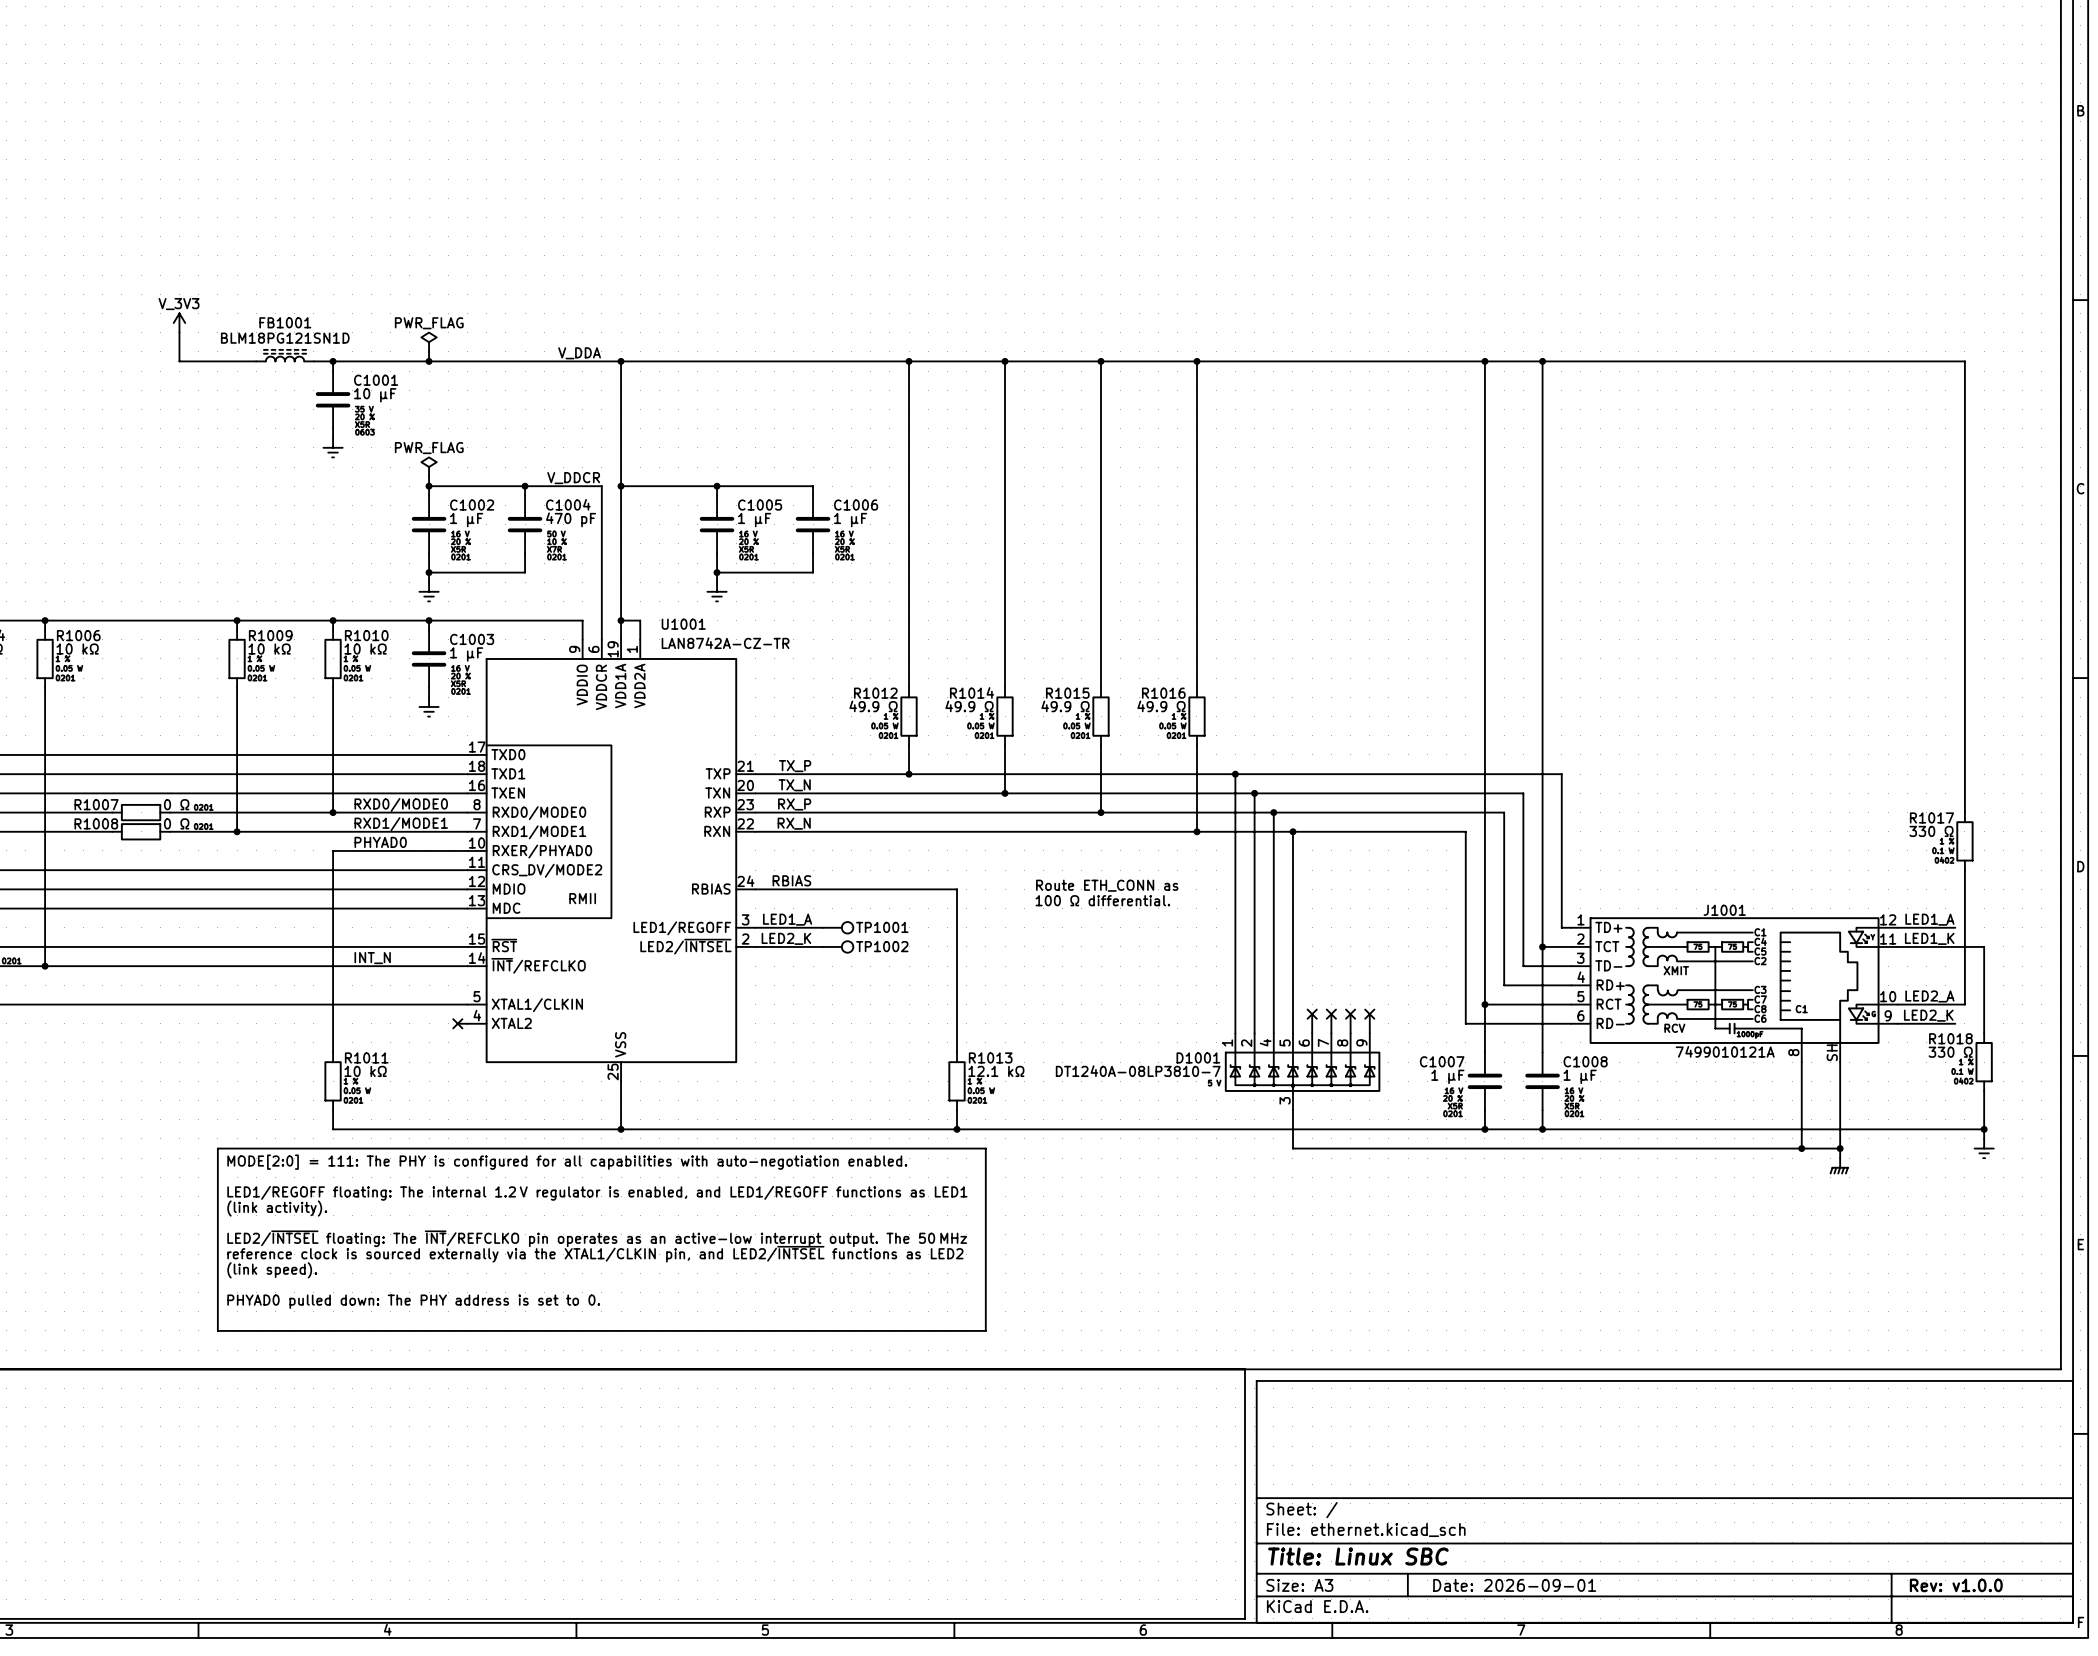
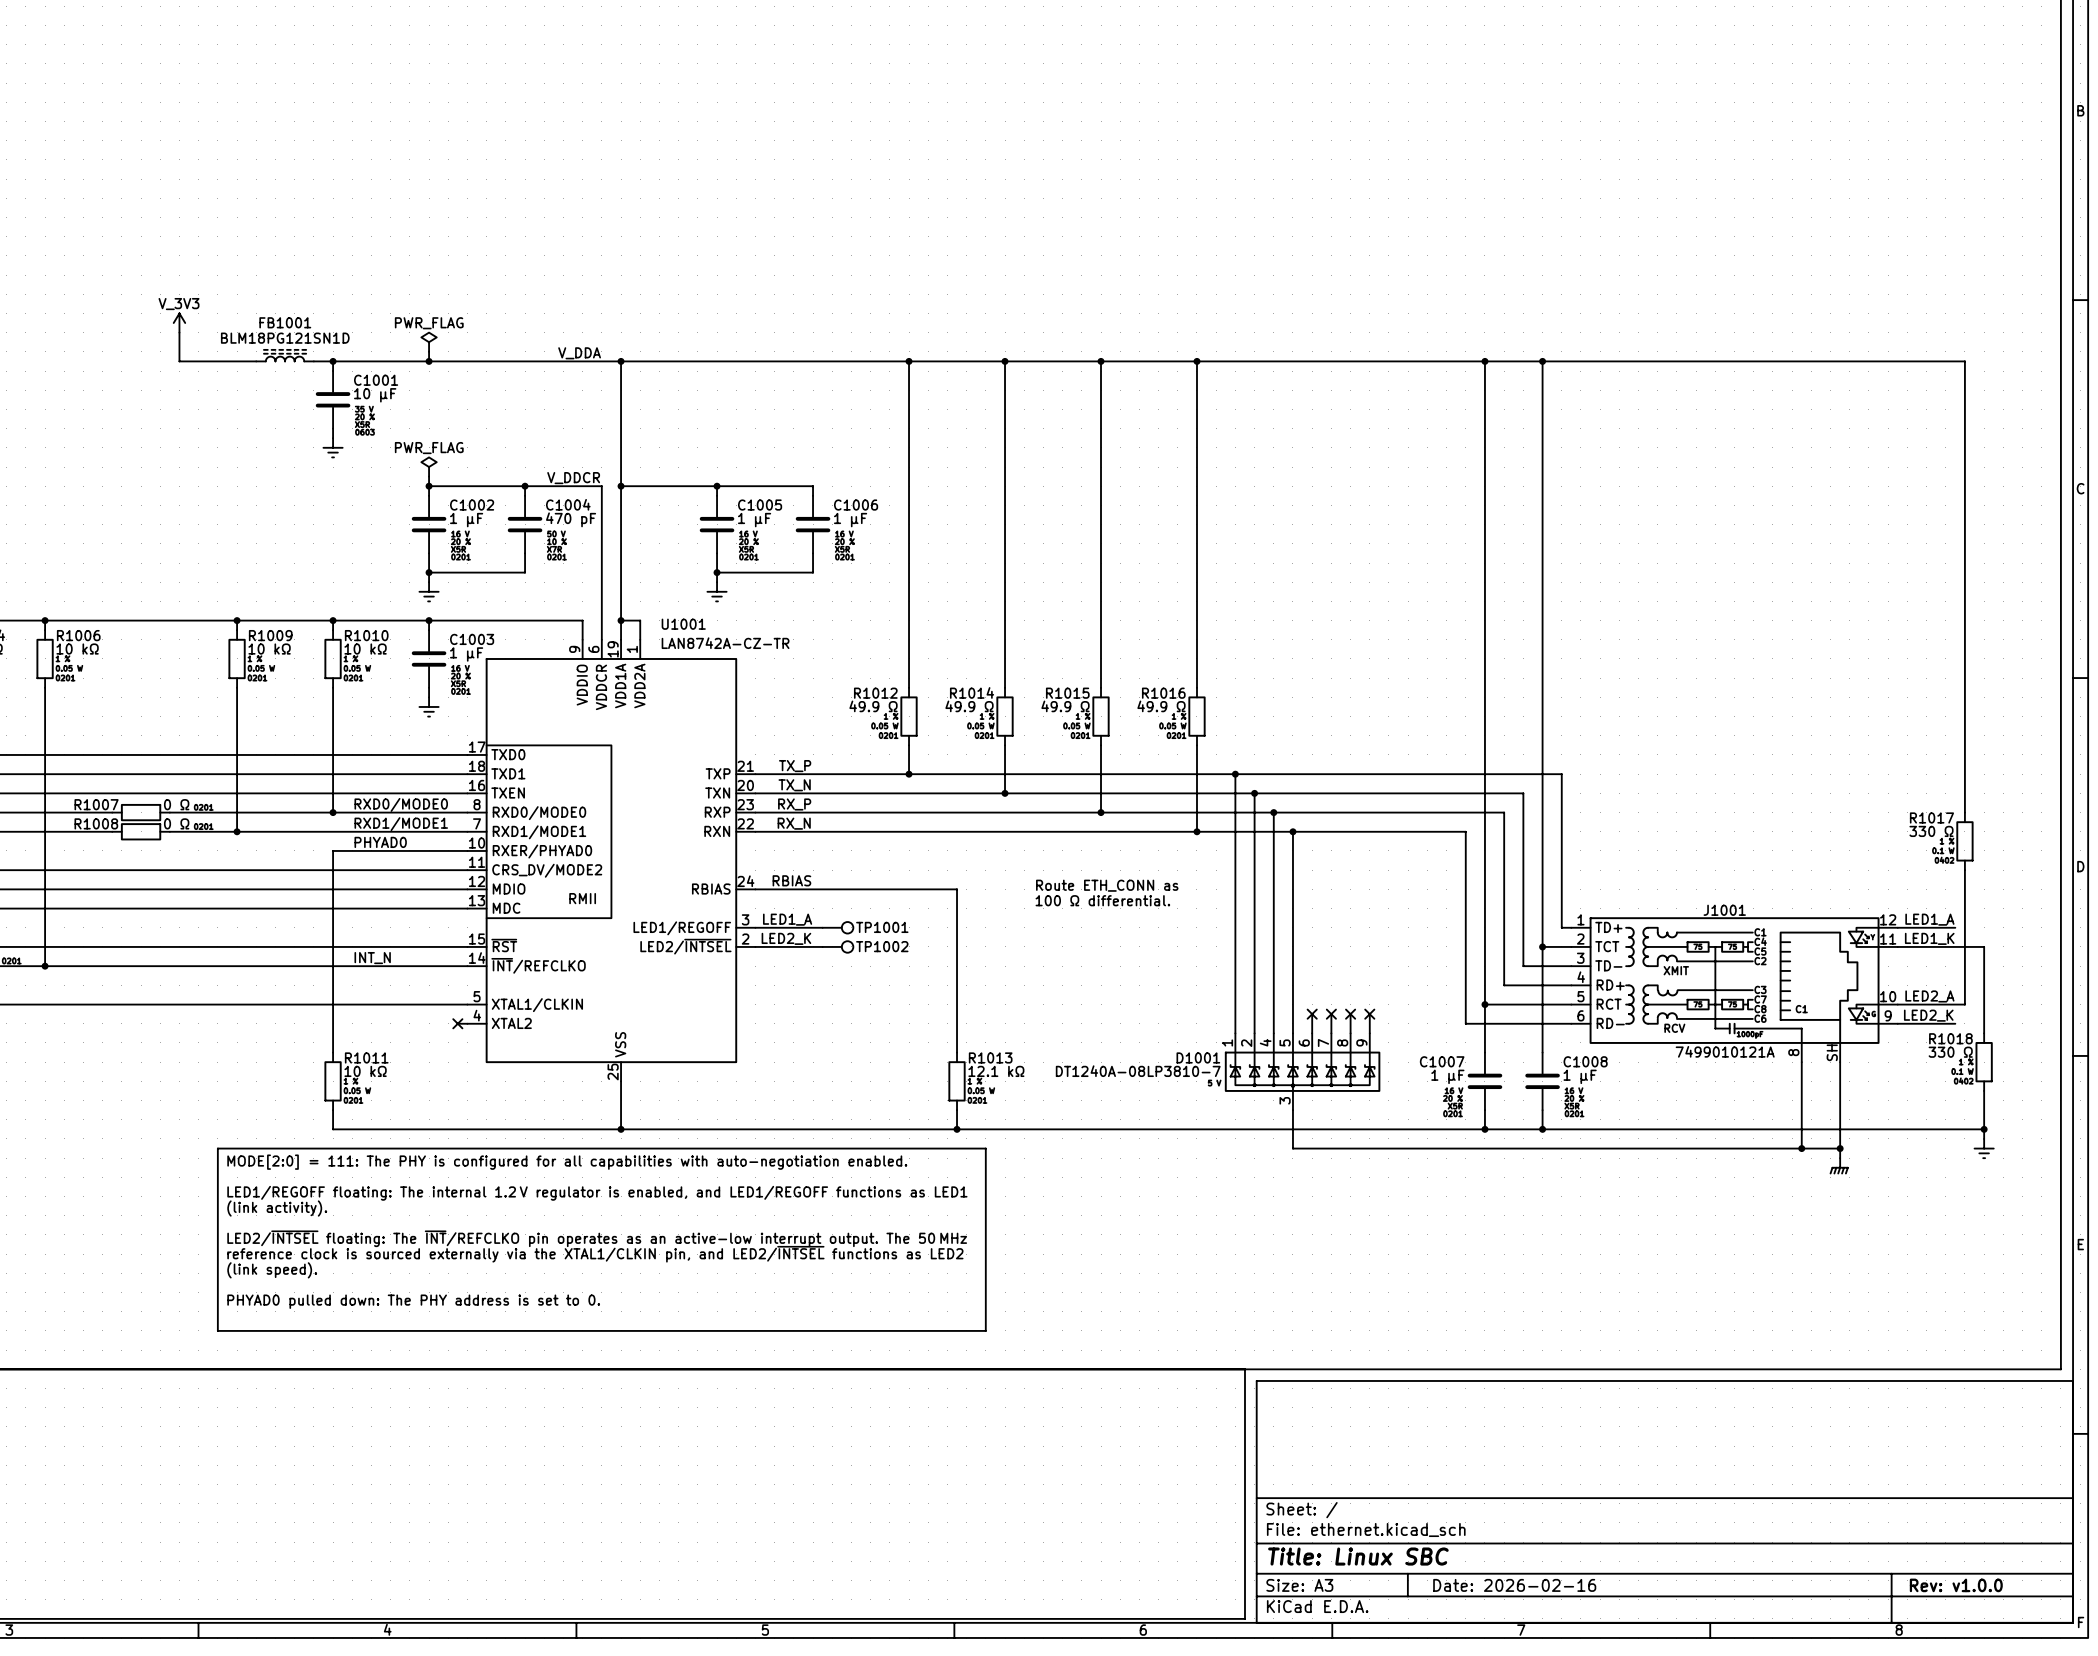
title block: Date: 2026-09-01 (1514, 1585) -> Date: 2026-02-16 (1514, 1585)

